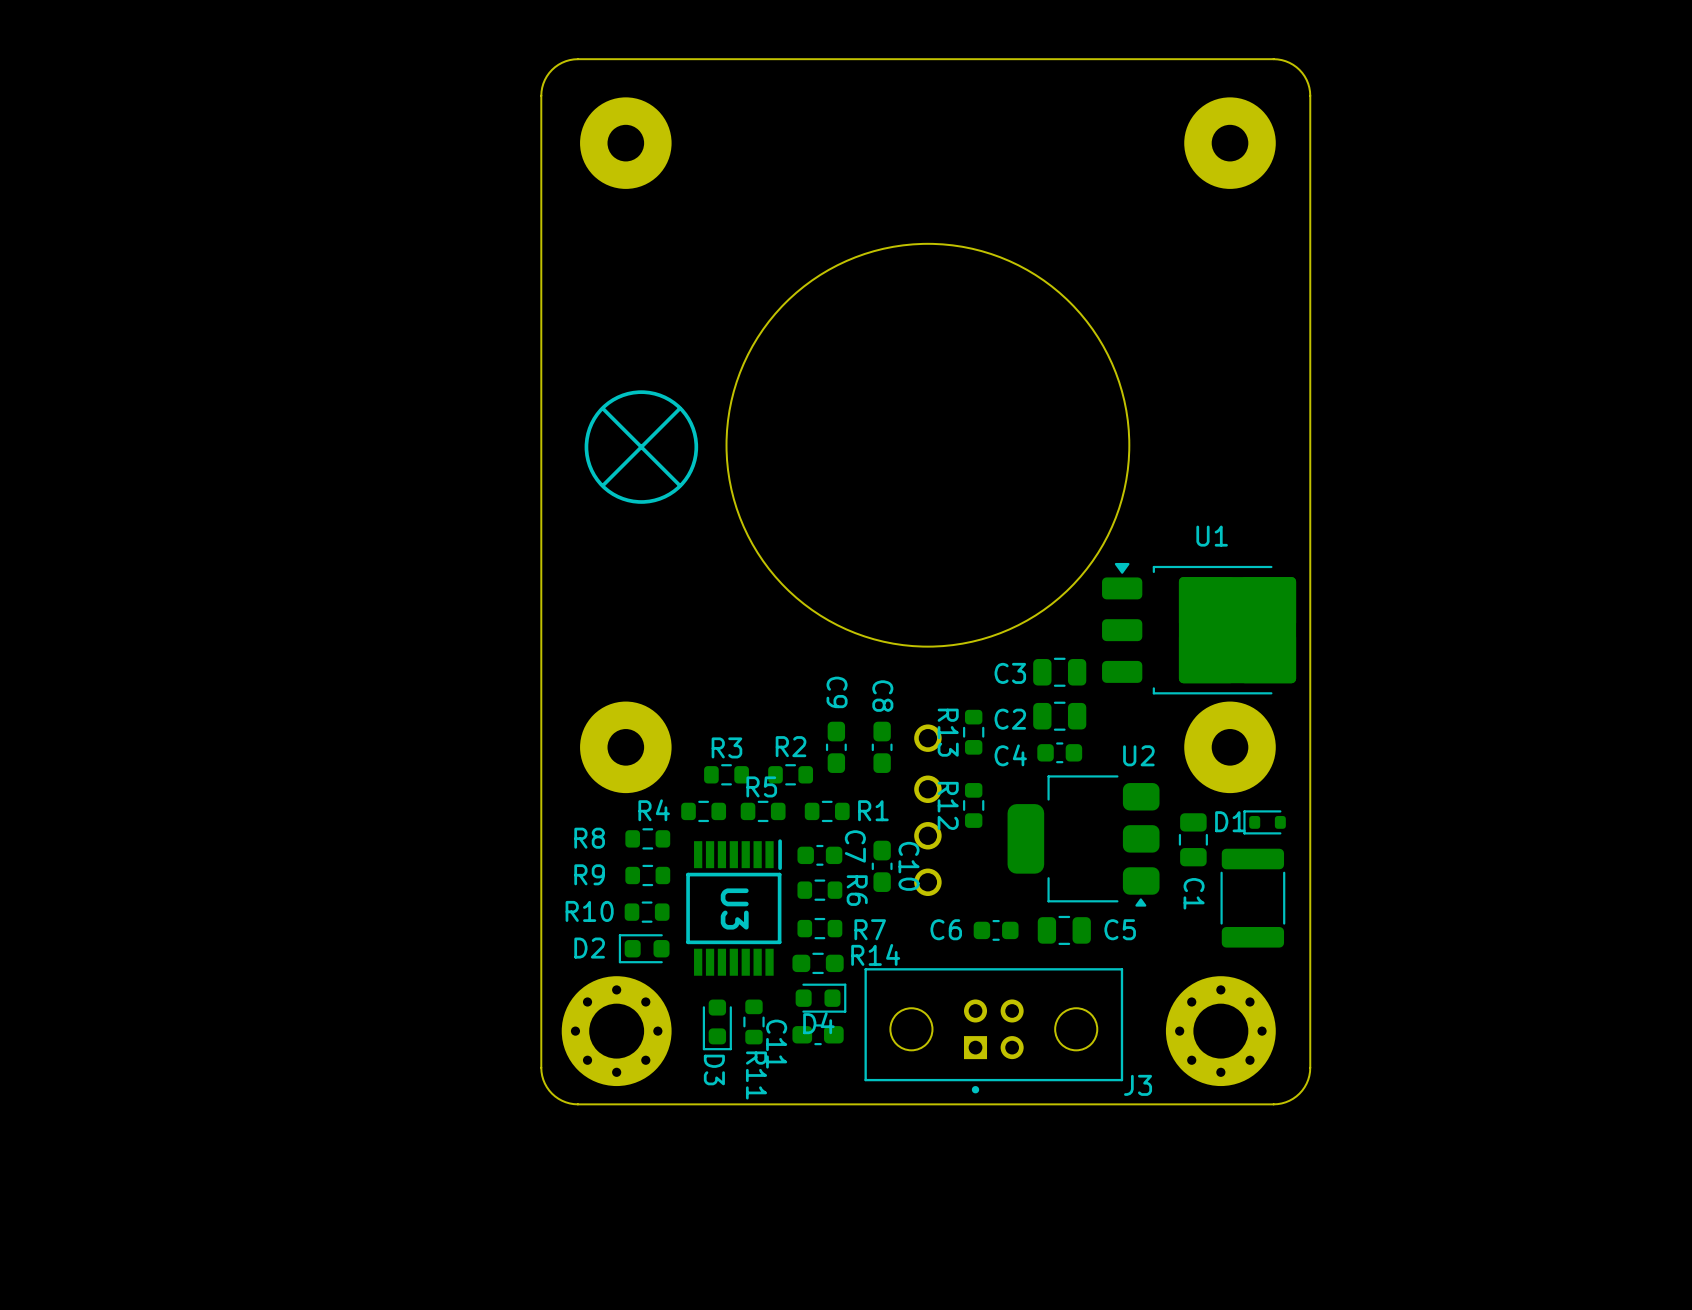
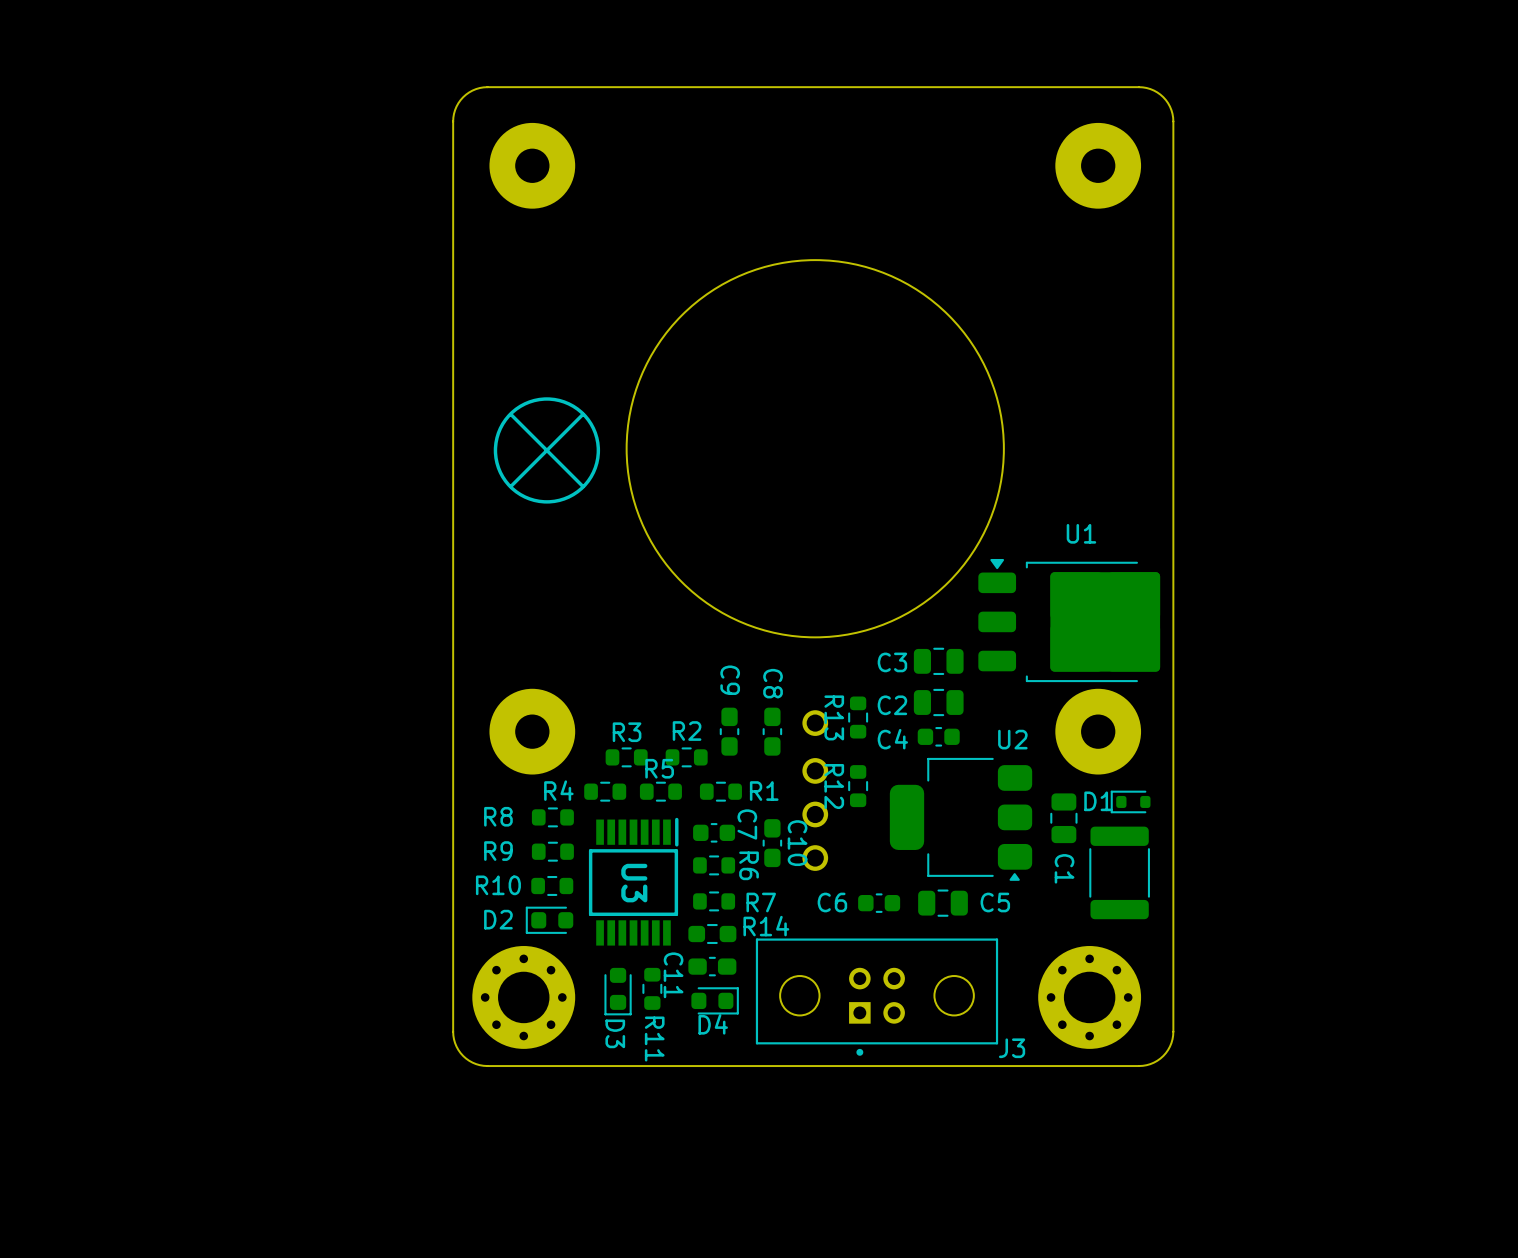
D4 position: (820, 998) -> (715, 1000)
C11 position: (818, 1034) -> (712, 966)

